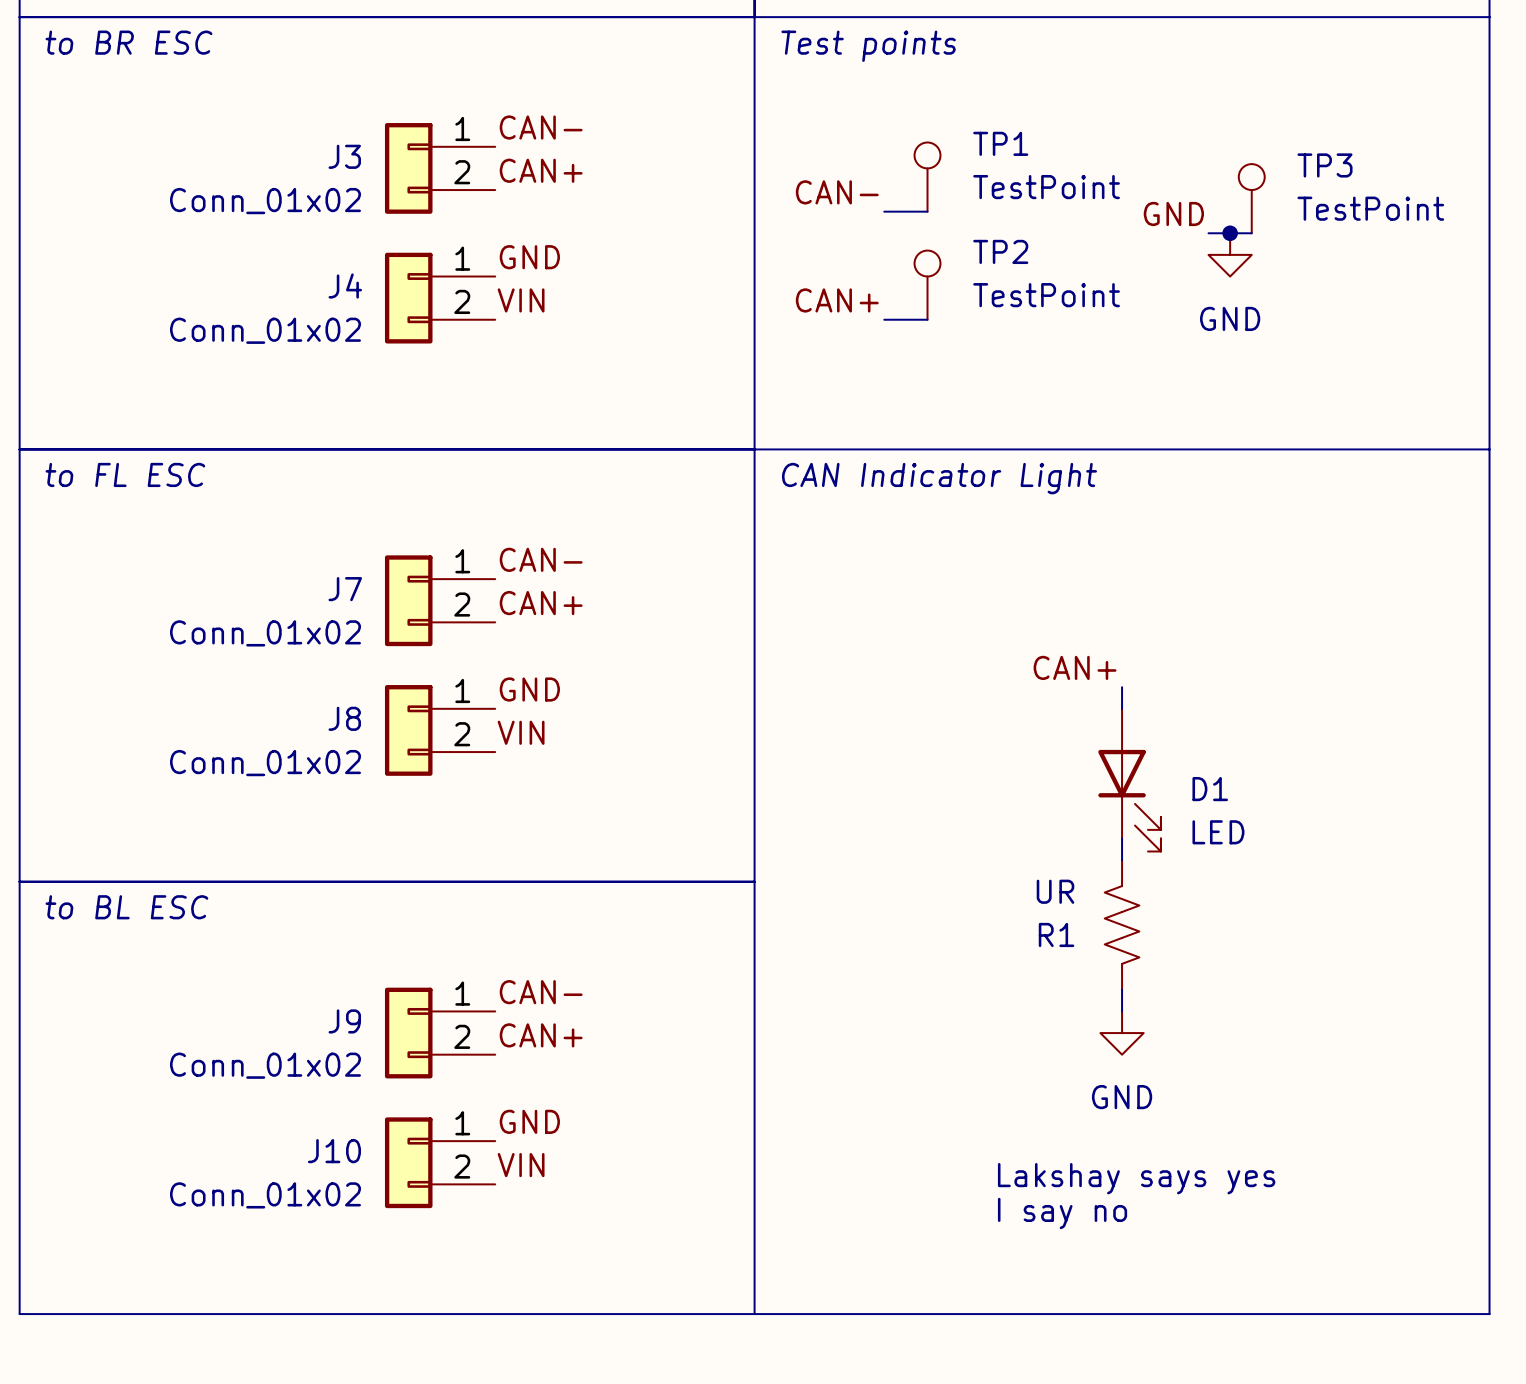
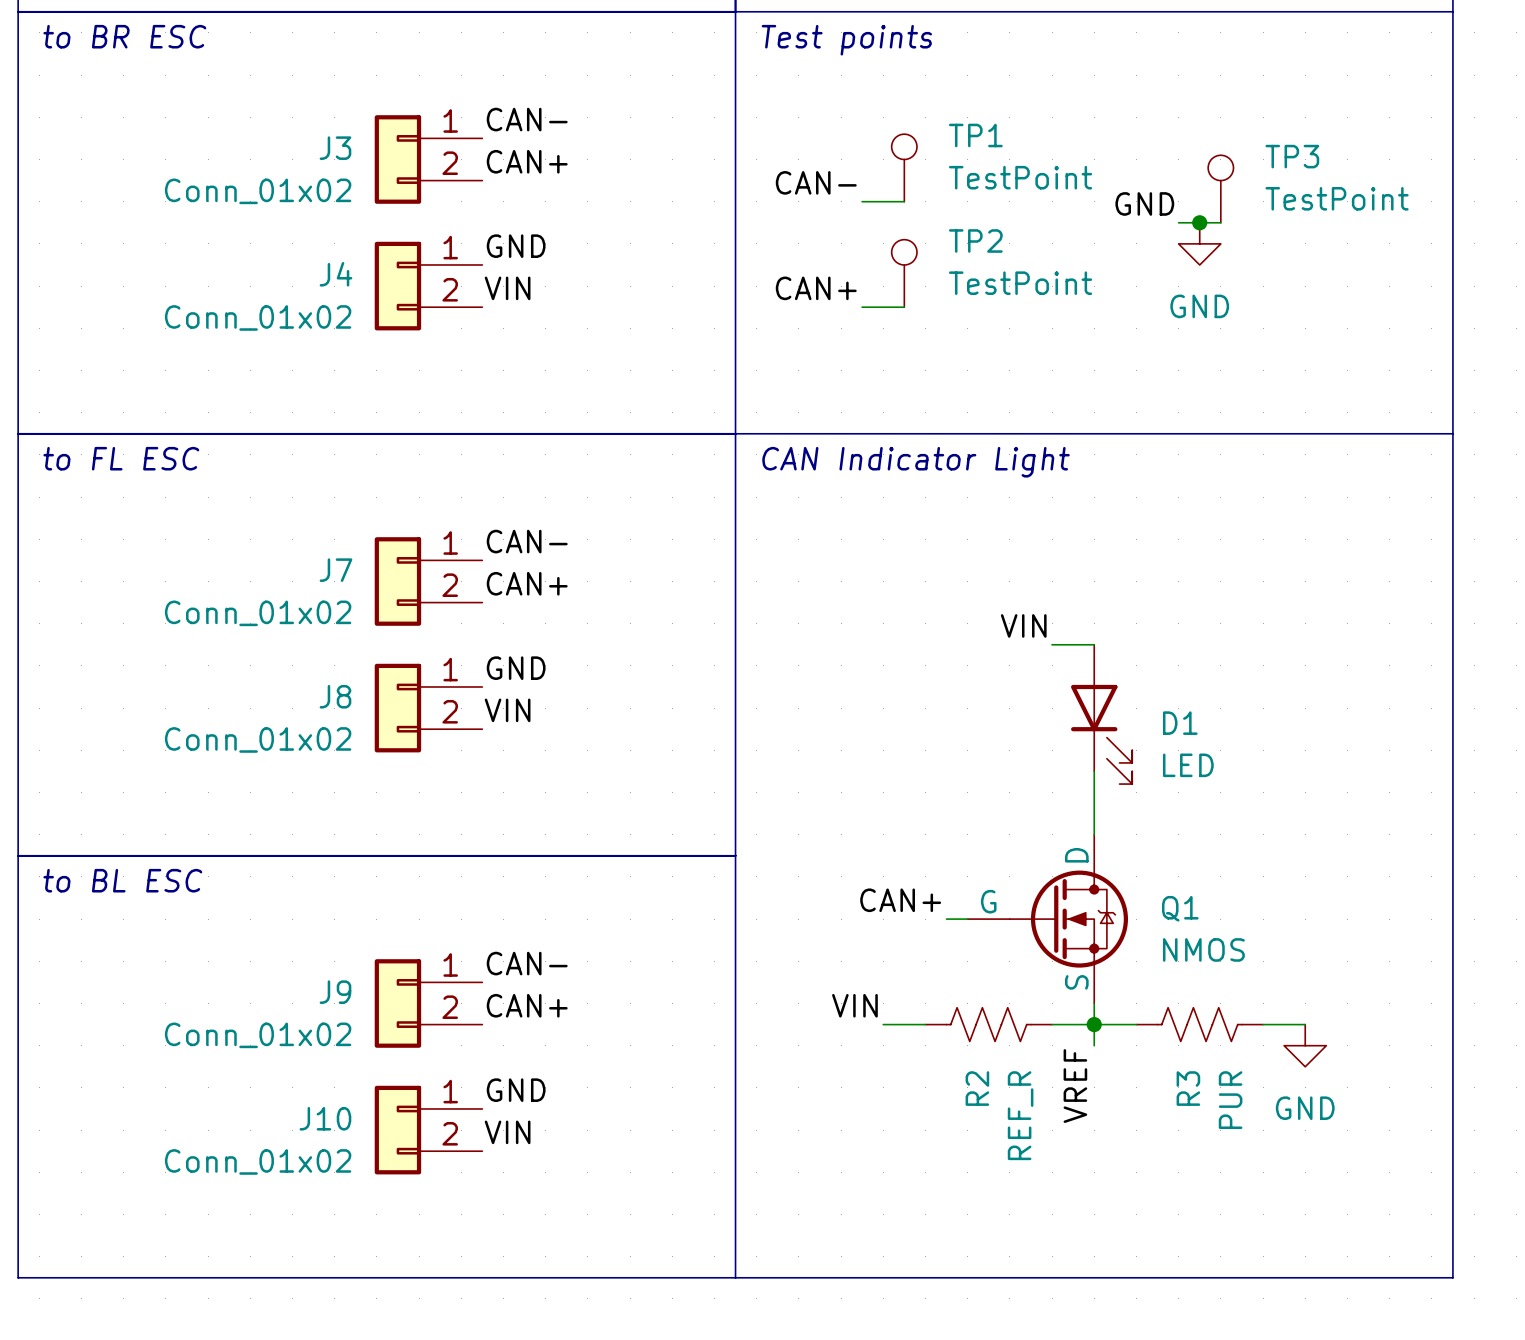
label: none -> VIN (1023, 625)
wire: none -> (1052, 644) (1094, 644)
label position: CAN+ (1075, 667) -> CAN+ (900, 900)
D1 position: (1129, 780) -> (1101, 714)
R1: UR (1122, 924) -> none
wire: none -> (946, 919) (967, 919)
Q1: none -> NMOS (1047, 919)
wire: none -> (1094, 1003) (1094, 1045)
power symbol position: GND (1122, 1033) -> GND (1305, 1045)
label: none -> VIN (854, 1005)
wire: none -> (883, 1024) (925, 1024)
R2: none -> REF_R (988, 1024)
wire: none -> (1052, 1024) (1136, 1024)
junction: none -> (1094, 1024)
R3: none -> PUR (1199, 1024)
wire: none -> (1263, 1024) (1305, 1024)
label: none -> VREF (1075, 1086)
text: Lakshay says yes (1136, 1178) -> none
text: I say no (1062, 1213) -> none

